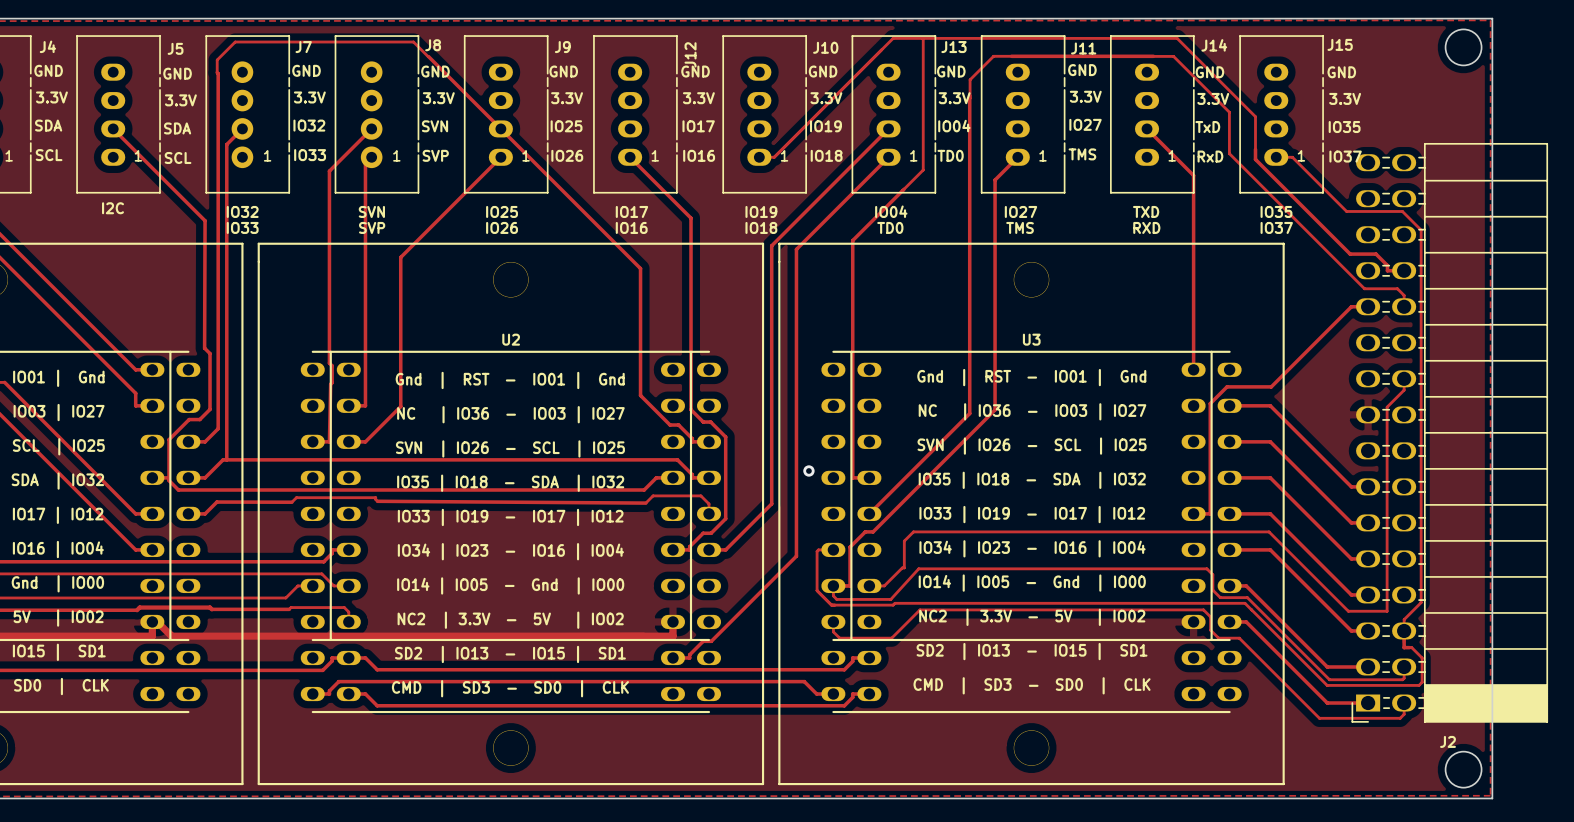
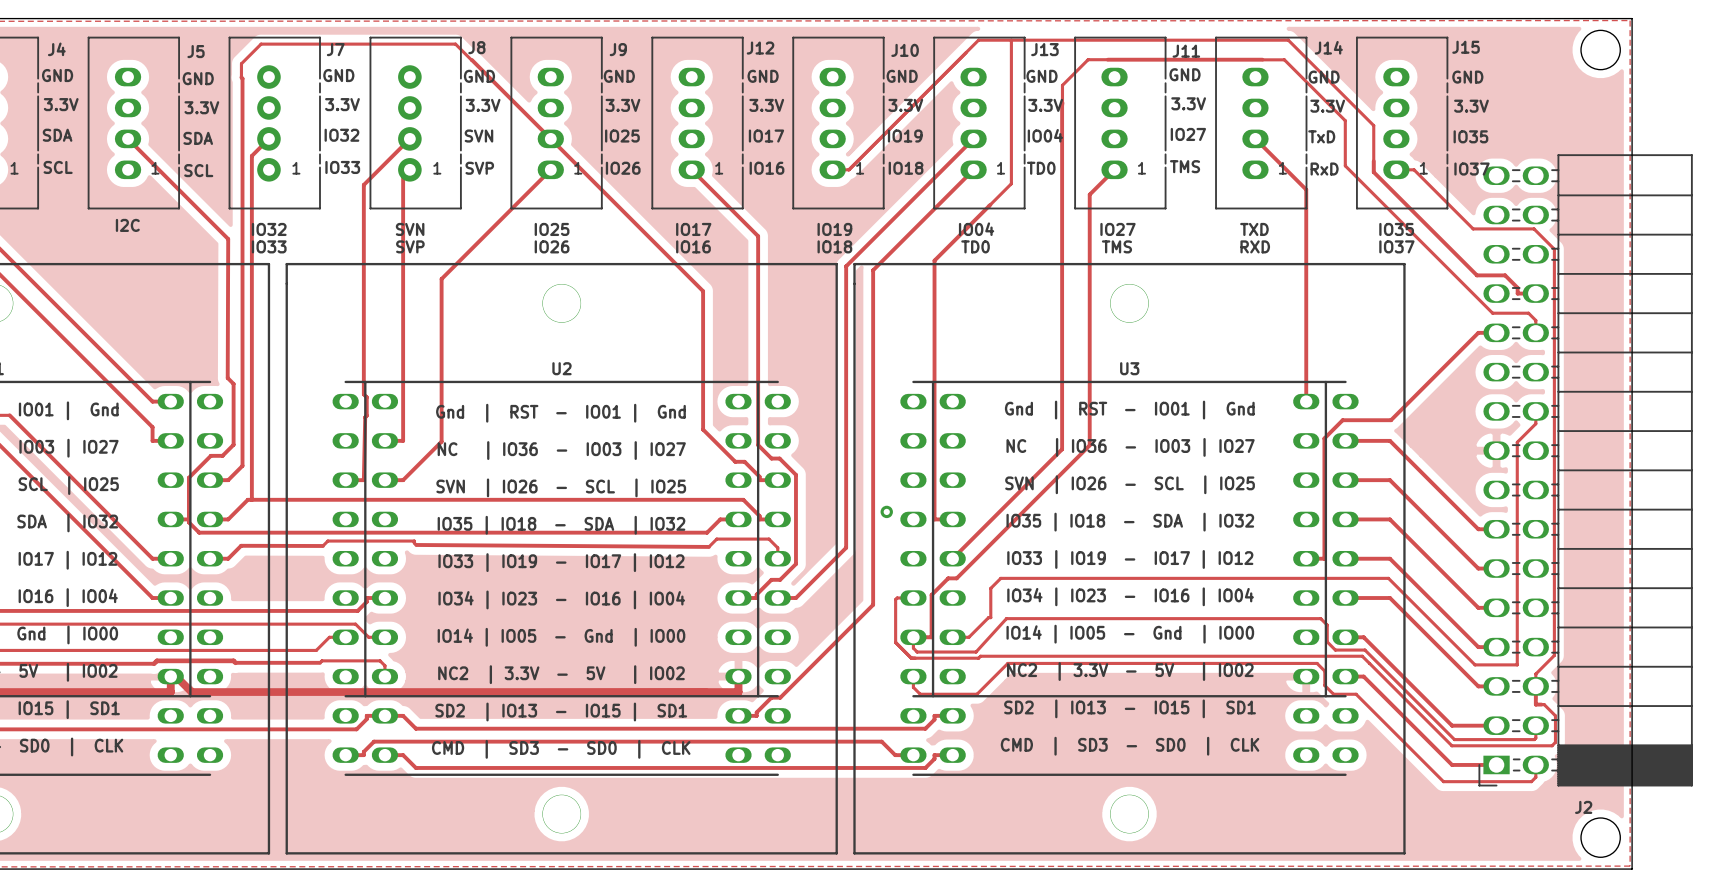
J12 name rotation: 0° (690, 54) -> 90° clockwise (760, 48)

